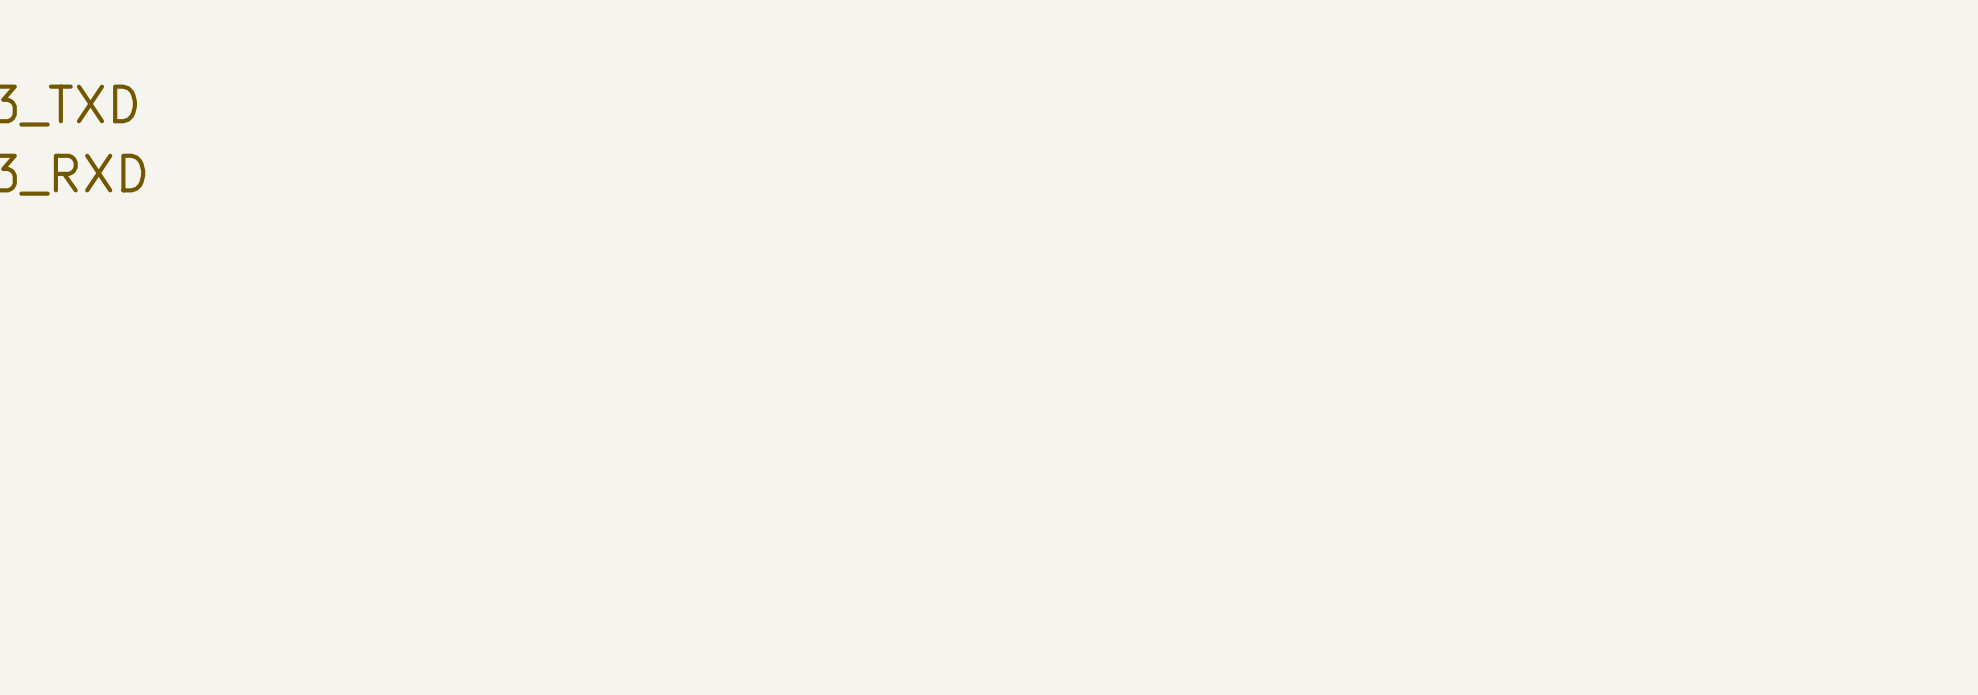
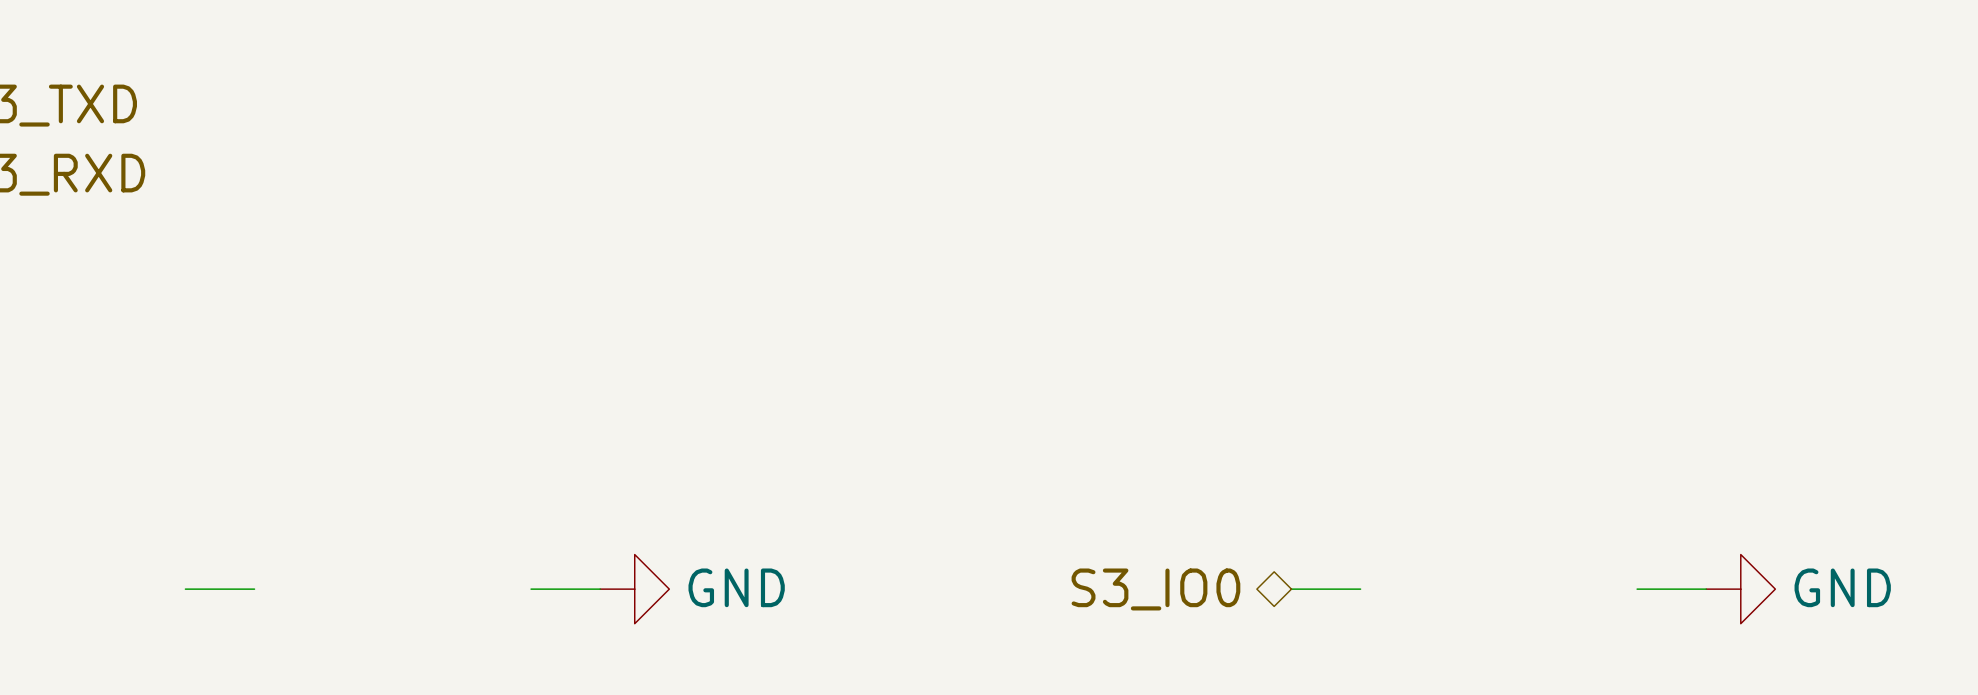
wire: none -> (185, 589) (254, 589)
wire: none -> (531, 589) (600, 589)
power symbol: none -> GND (634, 589)
hierarchical label: none -> S3_IO0 (1155, 589)
wire: none -> (1291, 589) (1360, 589)
wire: none -> (1637, 589) (1706, 589)
power symbol: none -> GND (1740, 589)

